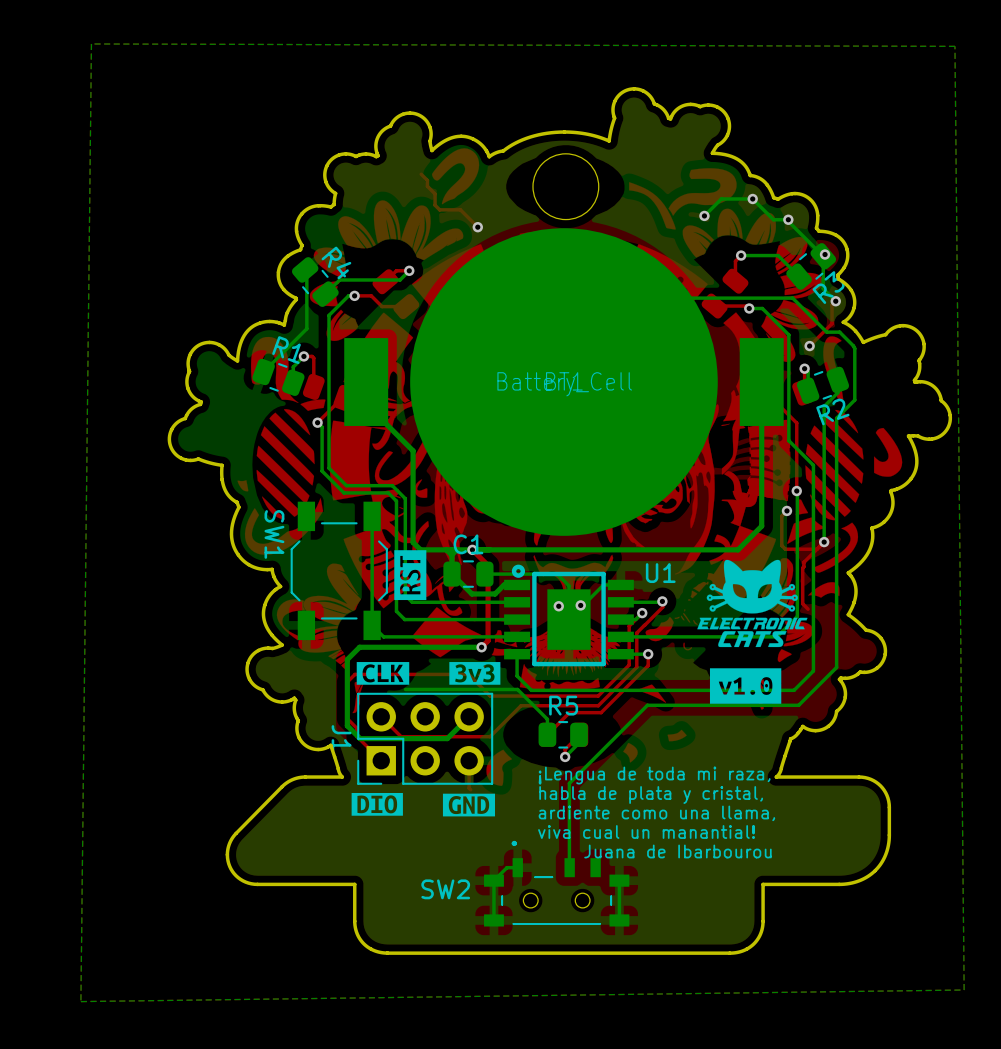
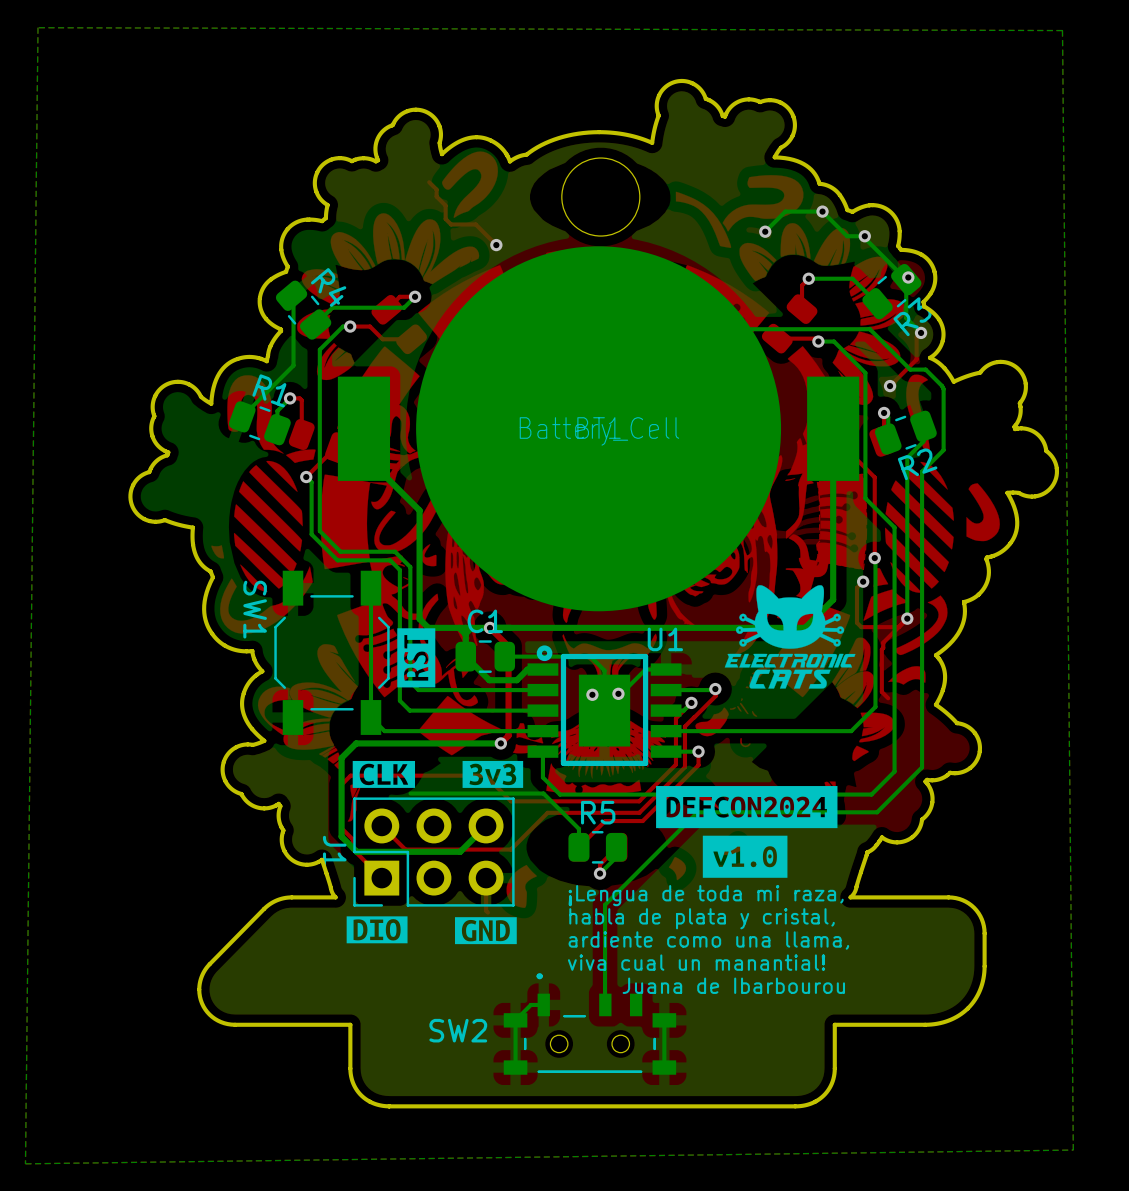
U1 name position: U1 (660, 573) -> U1 (665, 639)
drawing position: (752, 603) -> (790, 636)
drawing: none -> [656, 786, 838, 829]
drawing position: (745, 686) -> (745, 856)

